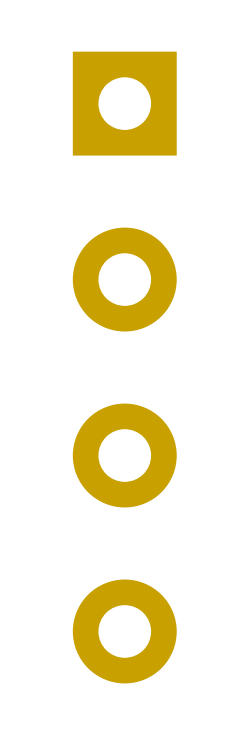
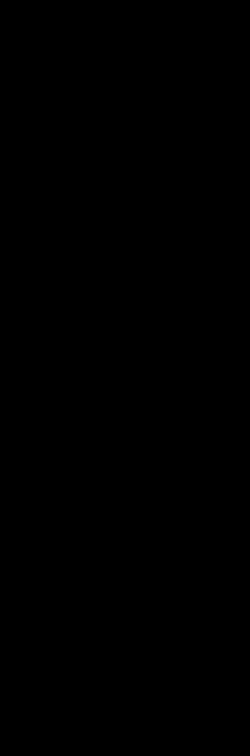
part: (124, 367) -> none

